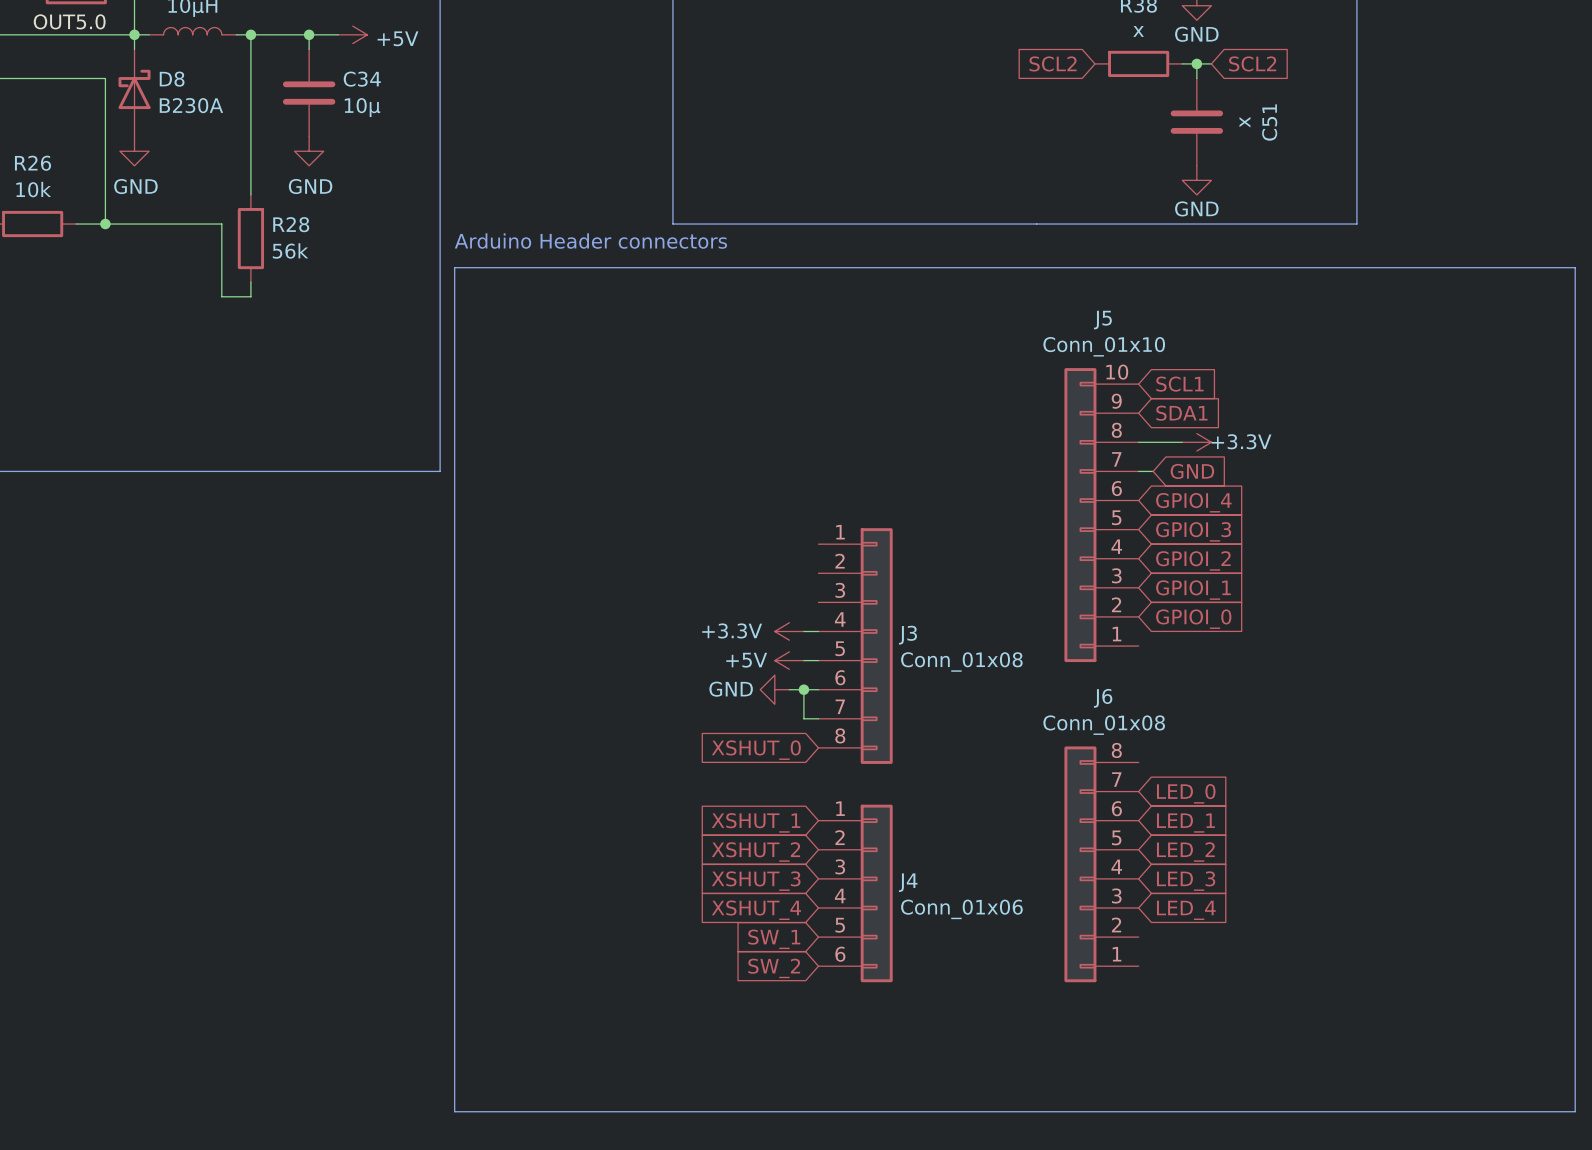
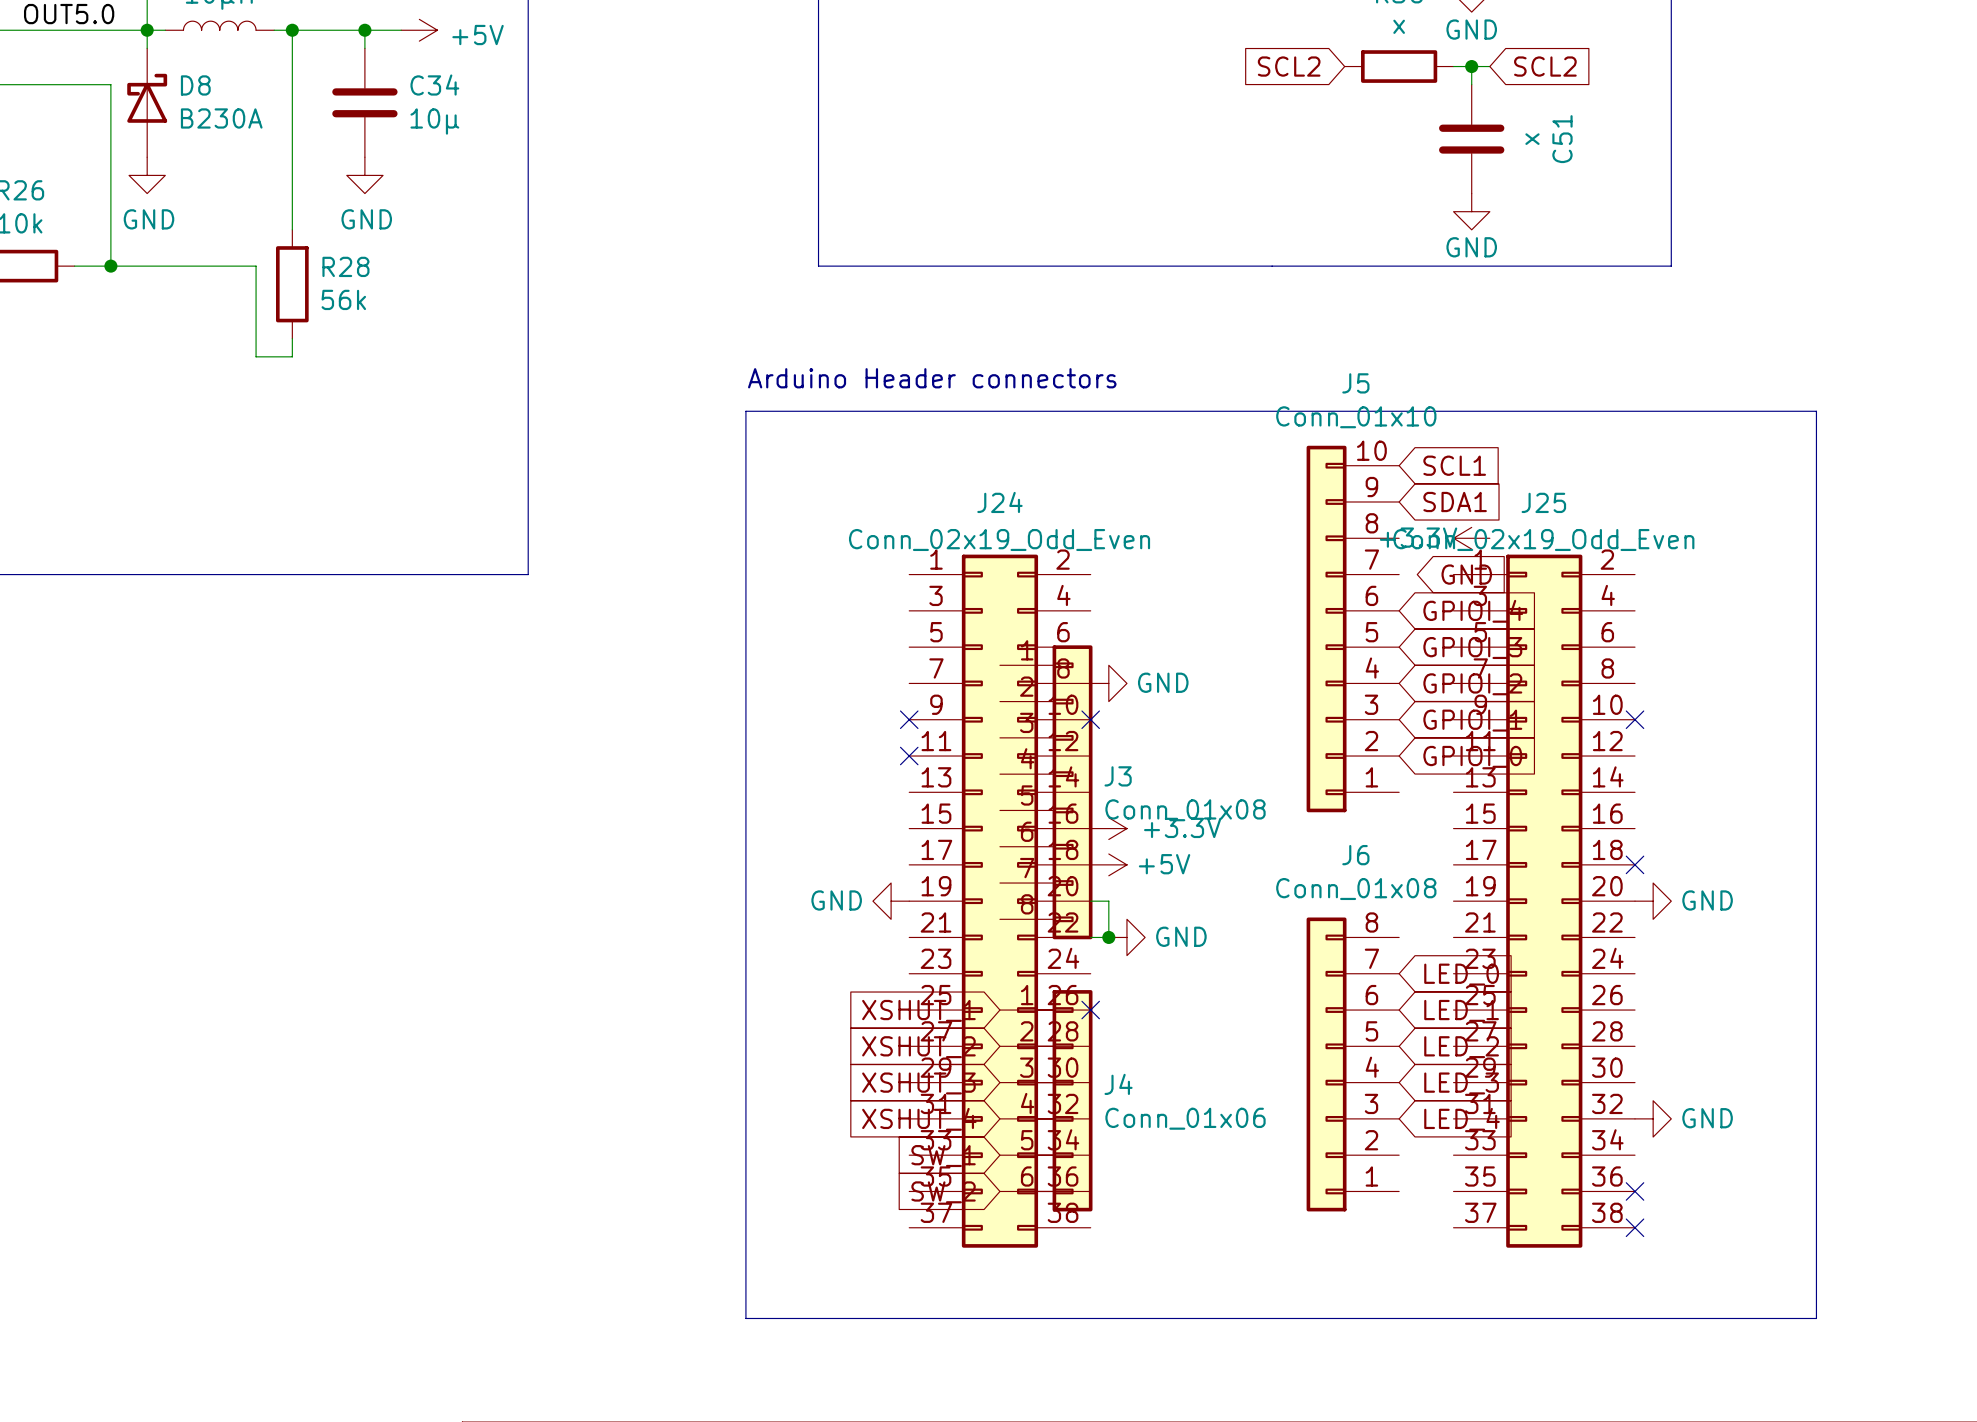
text position: Arduino Header connectors (590, 241) -> Arduino Header connectors (932, 378)
line: (454, 267) (1575, 267) (1575, 1111) (454, 1111) (454, 267) -> (745, 411) (745, 1318) (1816, 1318) (1816, 411) (745, 411)
wire: (1138, 442) (1182, 442) -> none
power symbol rotation: 0° (1196, 442) -> 180° (1471, 538)
wire: (1138, 471) (1153, 471) -> none
power symbol: none -> GND (1108, 683)
no-connect mark: none -> (909, 719)
no-connect mark: none -> (1090, 719)
no-connect mark: none -> (1635, 719)
no-connect mark: none -> (909, 756)
power symbol rotation: 0° (789, 631) -> 180° (1108, 828)
power symbol position: +3.3V (789, 631) -> +3.3V (1108, 828)
power symbol rotation: 0° (789, 660) -> 180° (1108, 864)
power symbol position: +5V (789, 660) -> +5V (1108, 864)
power symbol position: GND (774, 689) -> GND (891, 901)
junction: (803, 689) -> none
no-connect mark: none -> (1635, 864)
J24: none -> Conn_02x19_Odd_Even (999, 901)
wire: none -> (1090, 901) (1108, 901) (1108, 937) (1090, 937)
J25: none -> Conn_02x19_Odd_Even (1544, 901)
power symbol: none -> GND (1653, 901)
global label: XSHUT_0 (756, 750) -> none
junction: none -> (1108, 937)
power symbol: none -> GND (1126, 937)
no-connect mark: none -> (1090, 1010)
power symbol: none -> GND (1653, 1118)
no-connect mark: none -> (1635, 1191)
no-connect mark: none -> (1635, 1227)

